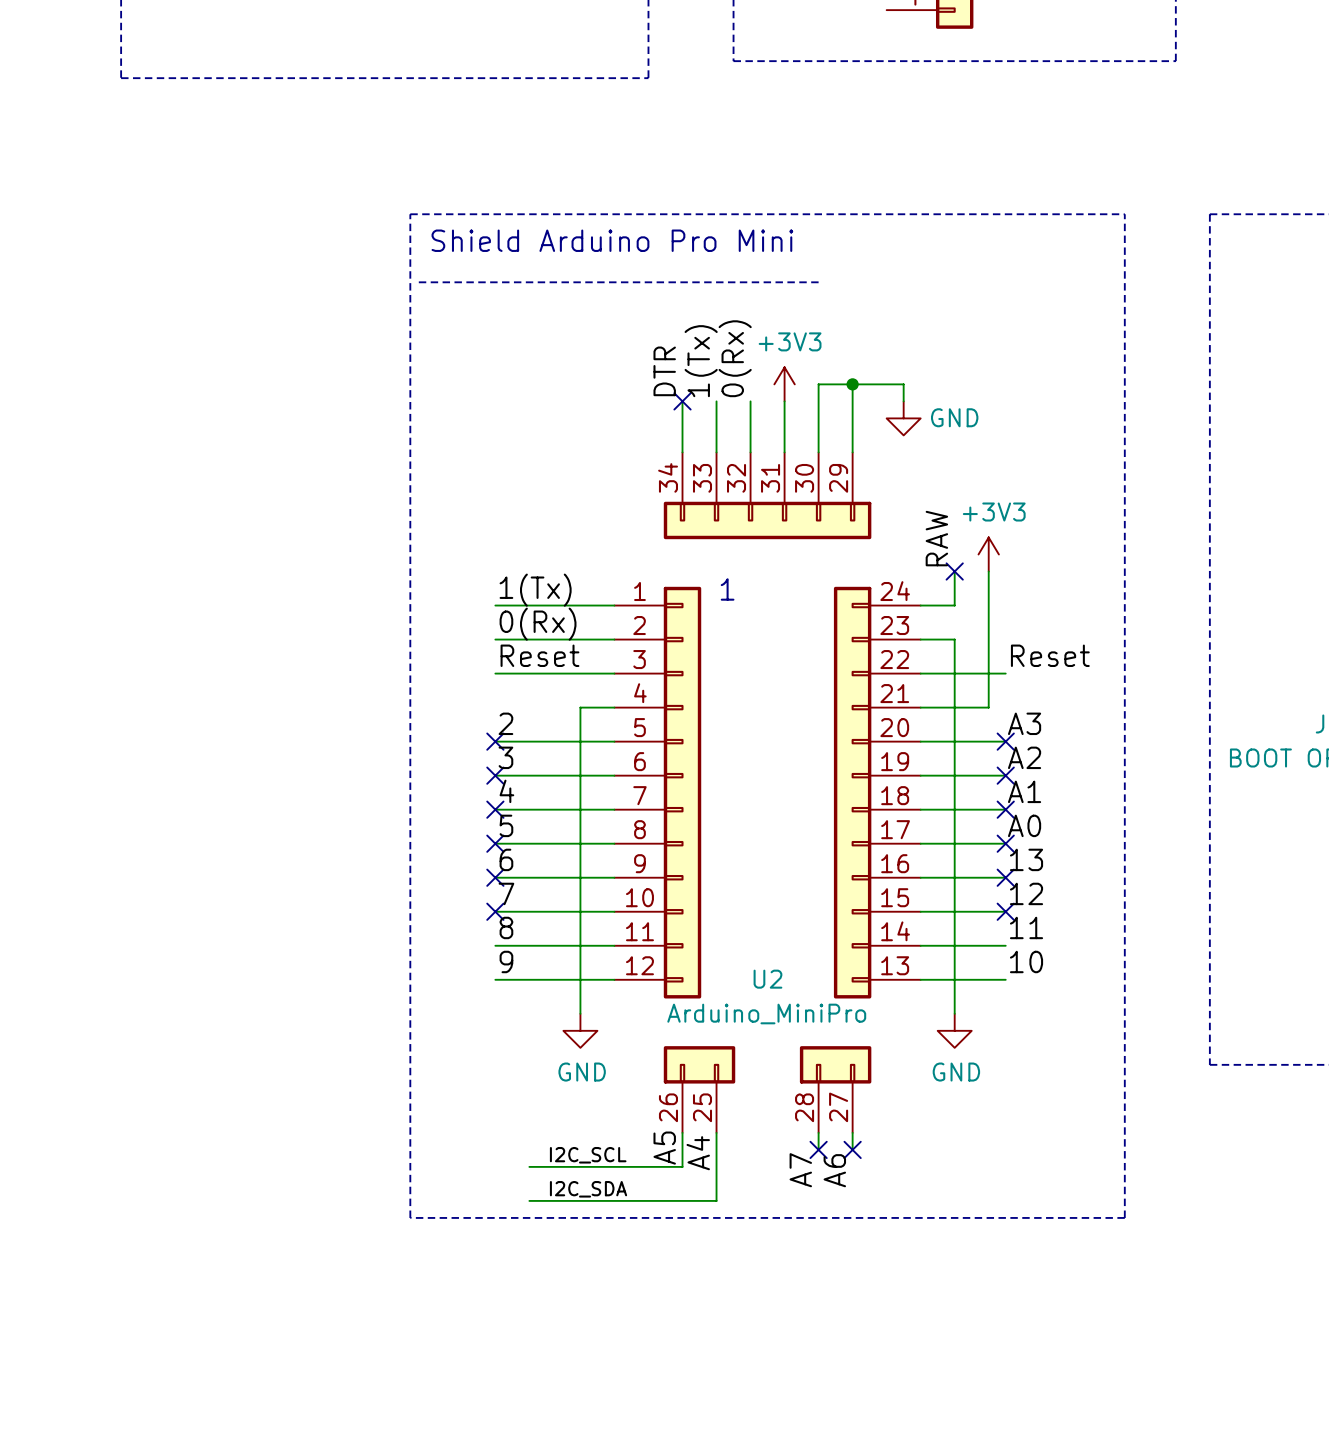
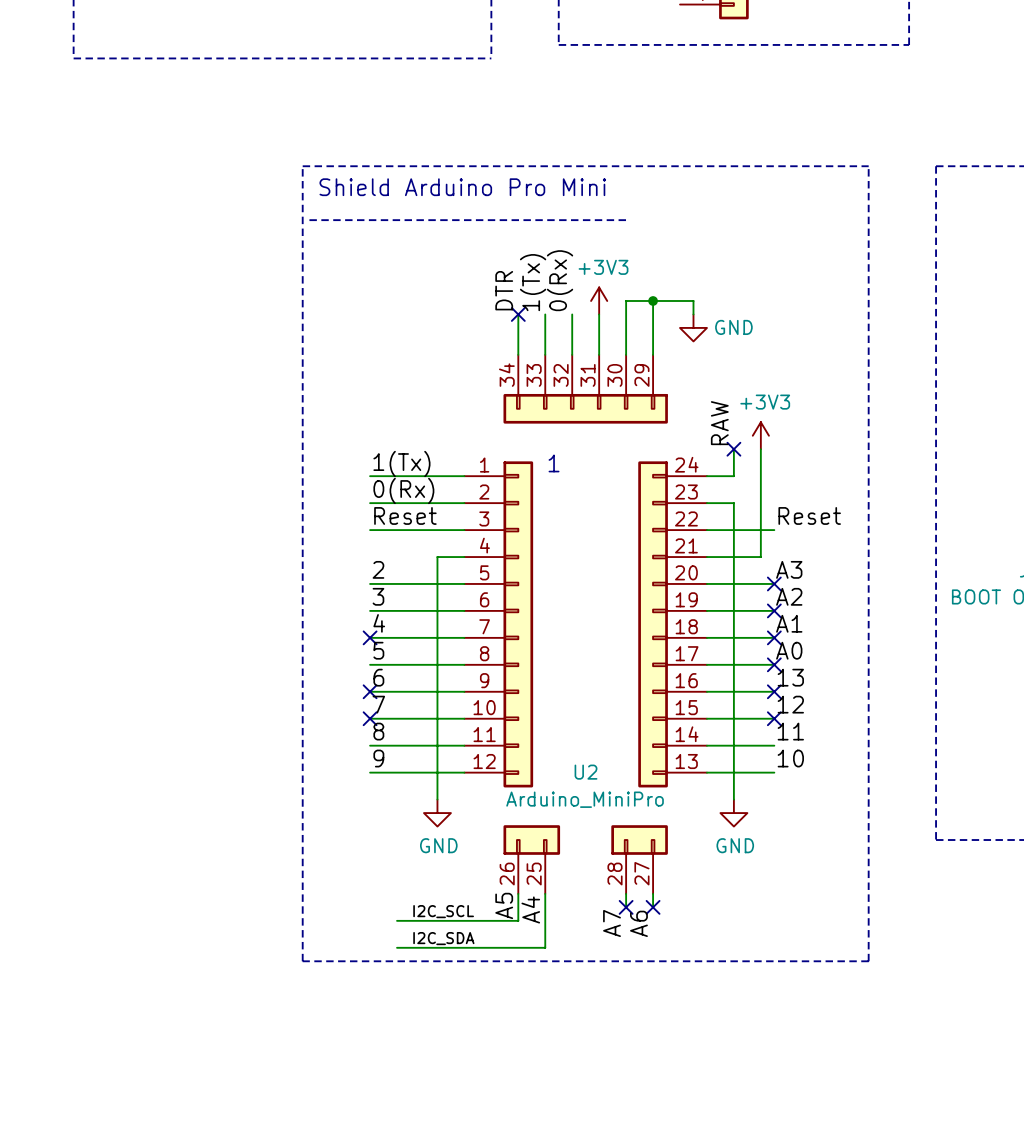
no-connect mark: (495, 741) -> none
no-connect mark: (495, 775) -> none
no-connect mark: (495, 843) -> none

